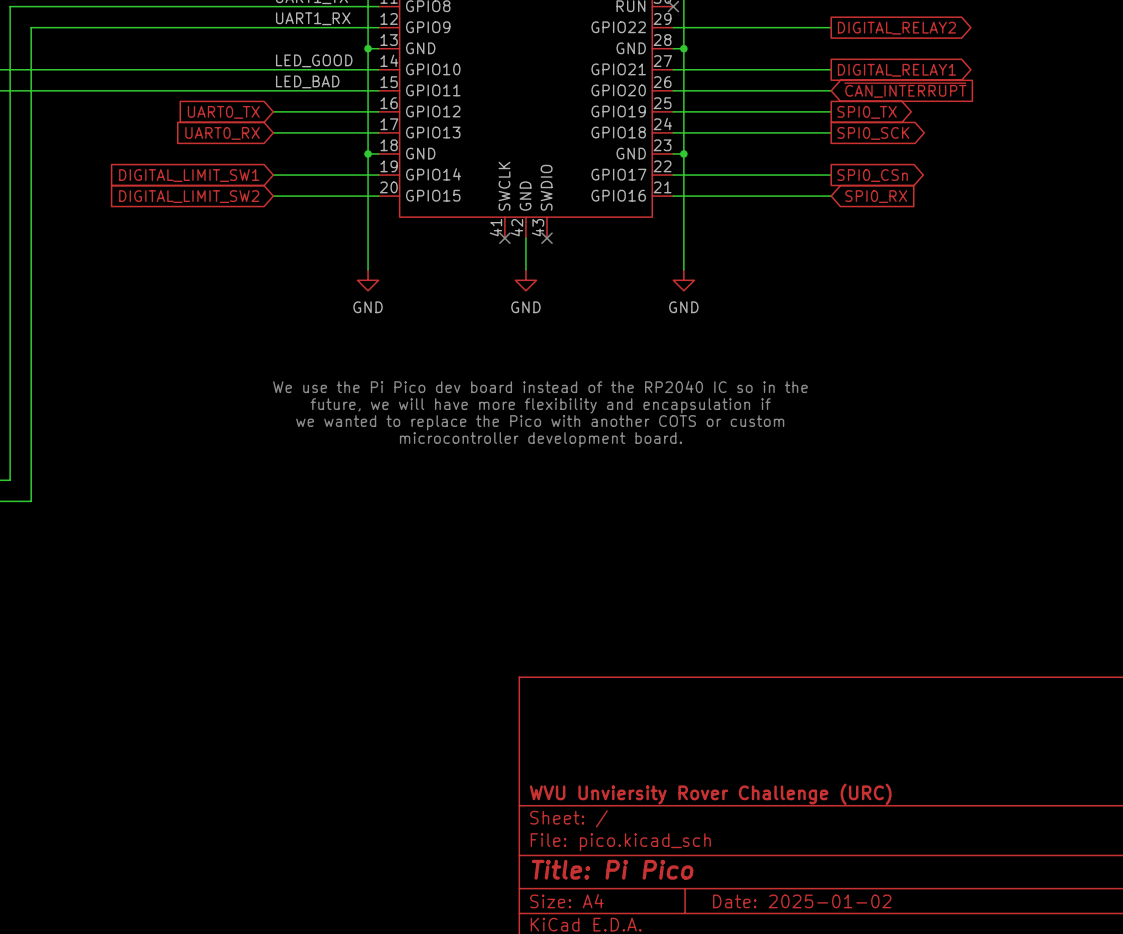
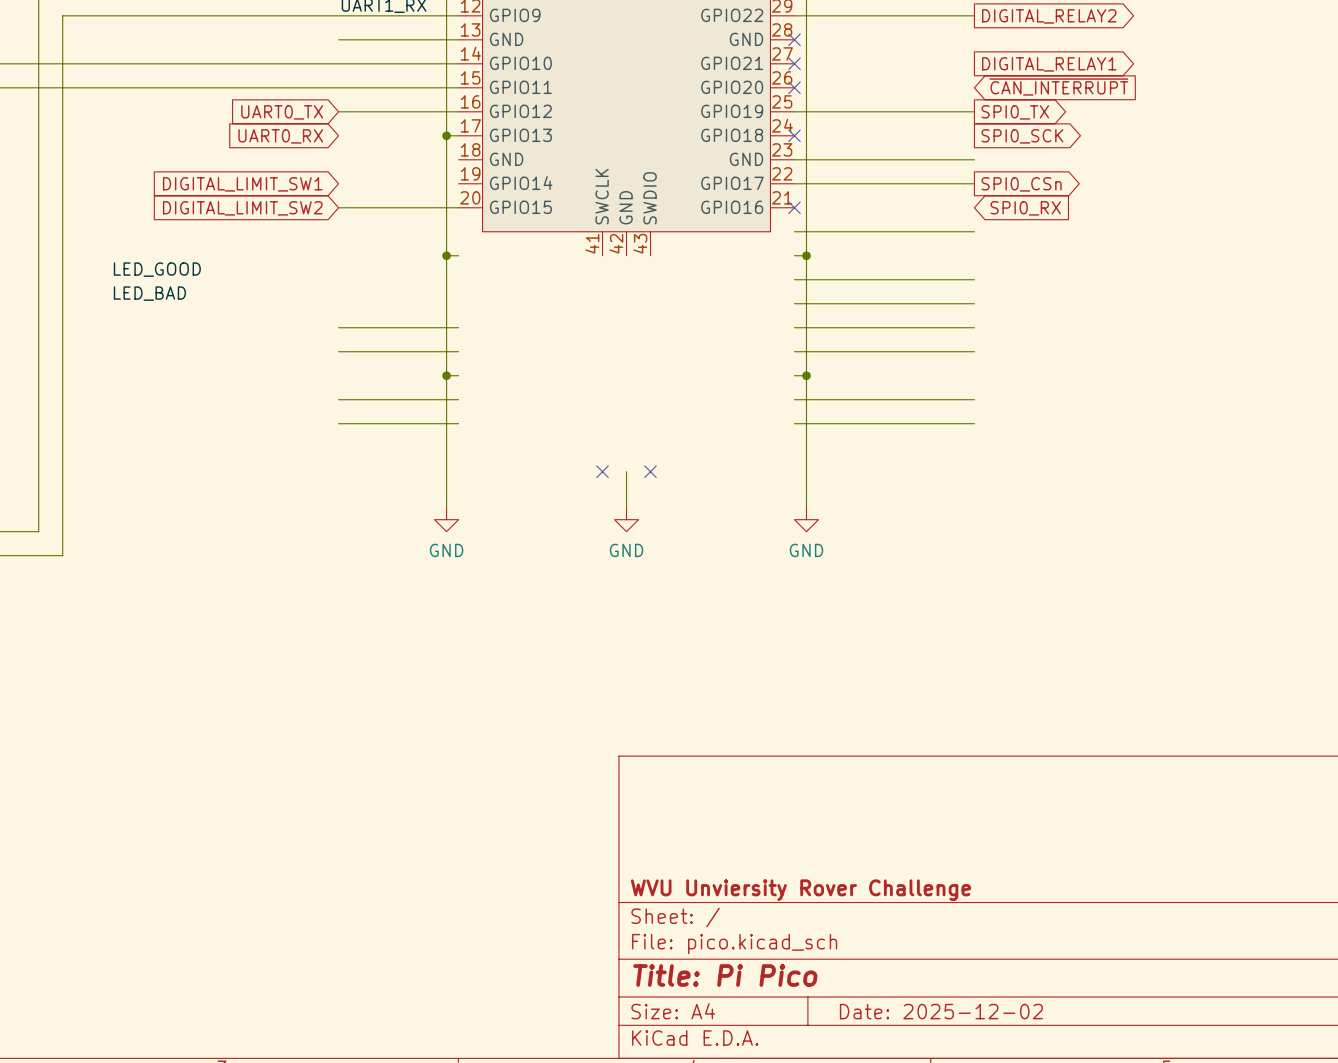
junction: (368, 48) -> none
wire: (673, 48) (683, 48) -> (794, 255) (806, 255)
no-connect mark: none -> (794, 39)
junction: (683, 48) -> none
label: LED_GOOD (314, 60) -> none
wire: (673, 69) (831, 69) -> (794, 279) (974, 279)
no-connect mark: none -> (794, 63)
label: LED_BAD (307, 81) -> none
wire: (673, 90) (831, 90) -> (794, 303) (974, 303)
no-connect mark: none -> (794, 87)
wire: (273, 132) (368, 132) -> (338, 39) (446, 39)
wire: (673, 132) (831, 132) -> (794, 351) (974, 351)
no-connect mark: none -> (794, 135)
wire: (368, 153) (378, 153) -> (446, 375) (458, 375)
junction position: (368, 153) -> (446, 135)
wire: none -> (806, 159) (974, 159)
junction: (683, 153) -> none
wire: (273, 175) (378, 175) -> (338, 399) (458, 399)
wire: (673, 196) (831, 196) -> (794, 423) (974, 423)
no-connect mark: none -> (794, 207)
wire: none -> (794, 231) (974, 231)
wire: none -> (446, 255) (458, 255)
junction: none -> (446, 255)
no-connect mark: (504, 238) -> none
wire: (525, 238) (525, 269) -> (626, 471) (626, 507)
no-connect mark: (547, 238) -> none
junction: none -> (806, 255)
label: none -> LED_GOOD (157, 269)
wire: none -> (446, 291) (446, 507)
wire: none -> (806, 291) (806, 507)
label: none -> LED_BAD (149, 293)
power symbol: GND (368, 280) -> none
power symbol: GND (525, 280) -> none
power symbol: GND (683, 280) -> none
wire: none -> (338, 327) (458, 327)
wire: none -> (794, 327) (974, 327)
wire: none -> (338, 351) (458, 351)
junction: none -> (446, 375)
wire: none -> (794, 375) (806, 375)
junction: none -> (806, 375)
wire: none -> (794, 399) (974, 399)
wire: none -> (338, 423) (458, 423)
text: We use the Pi Pico dev board instead of the RP2040 IC so in the (540, 386) -> none
text: future, we will have more flexibility and encapsulation if (540, 405) -> none
text: we wanted to replace the Pico with another COTS or custom (540, 422) -> none
no-connect mark: none -> (602, 471)
no-connect mark: none -> (650, 471)
text: microcontroller development board. (540, 439) -> none
power symbol: none -> GND (446, 519)
power symbol: none -> GND (626, 519)
power symbol: none -> GND (806, 519)
title block: WVU Unviersity Rover Challenge (URC) (710, 794) -> WVU Unviersity Rover Challenge (800, 890)
title block: Date: 2025-01-02 (802, 901) -> Date: 2025-12-02 (941, 1011)

